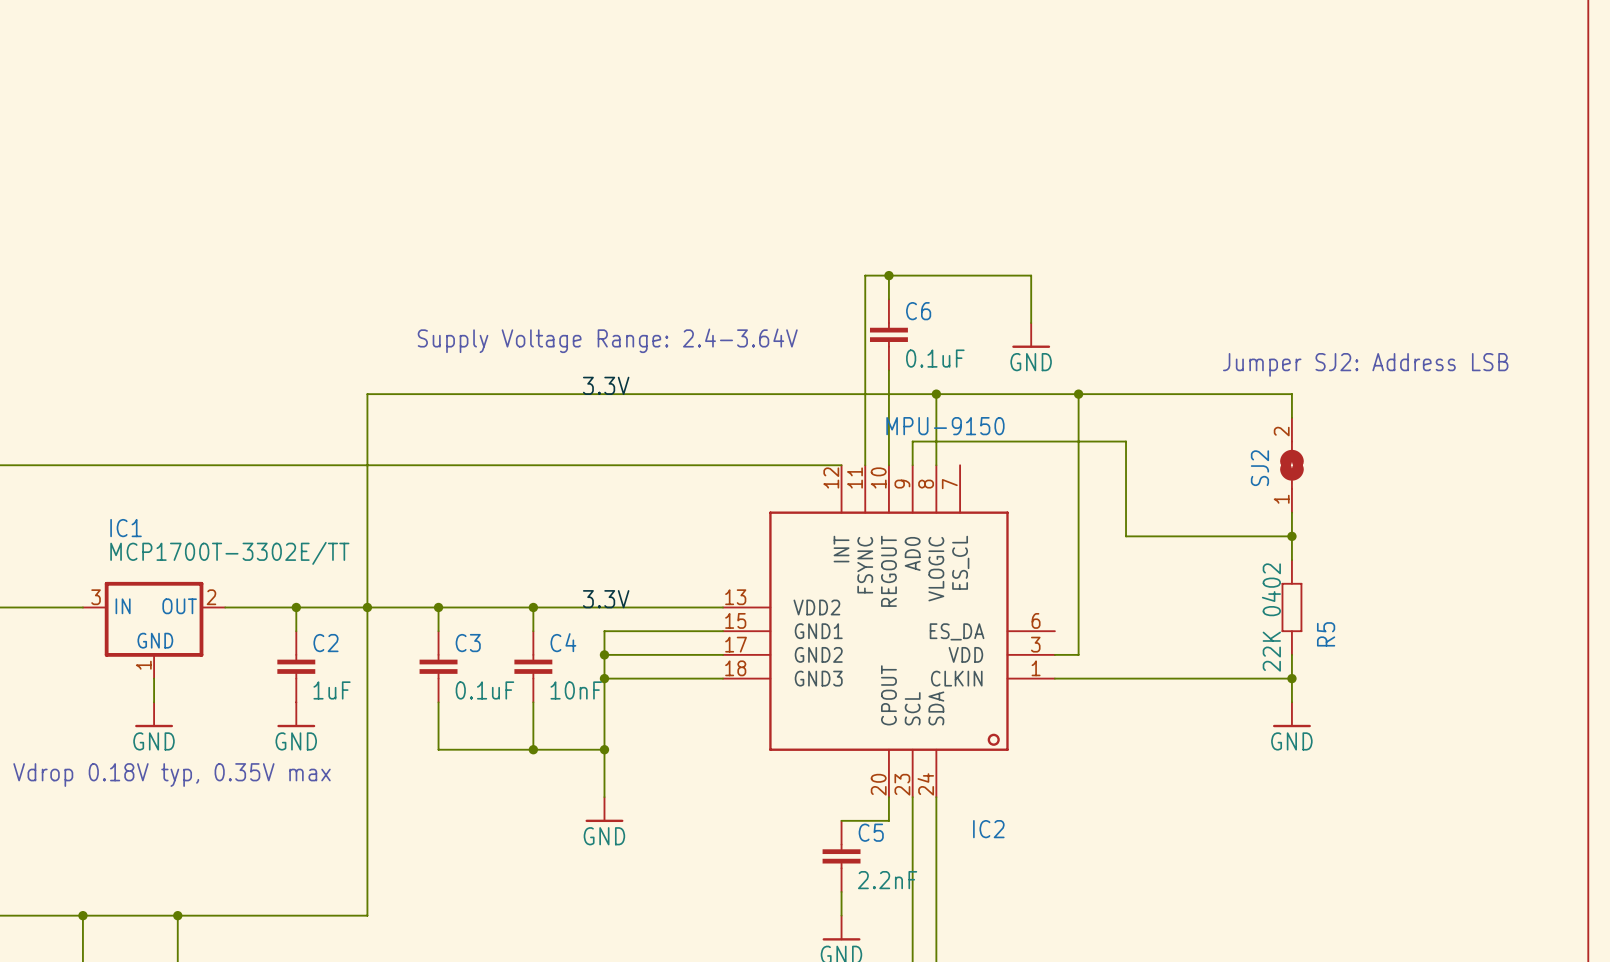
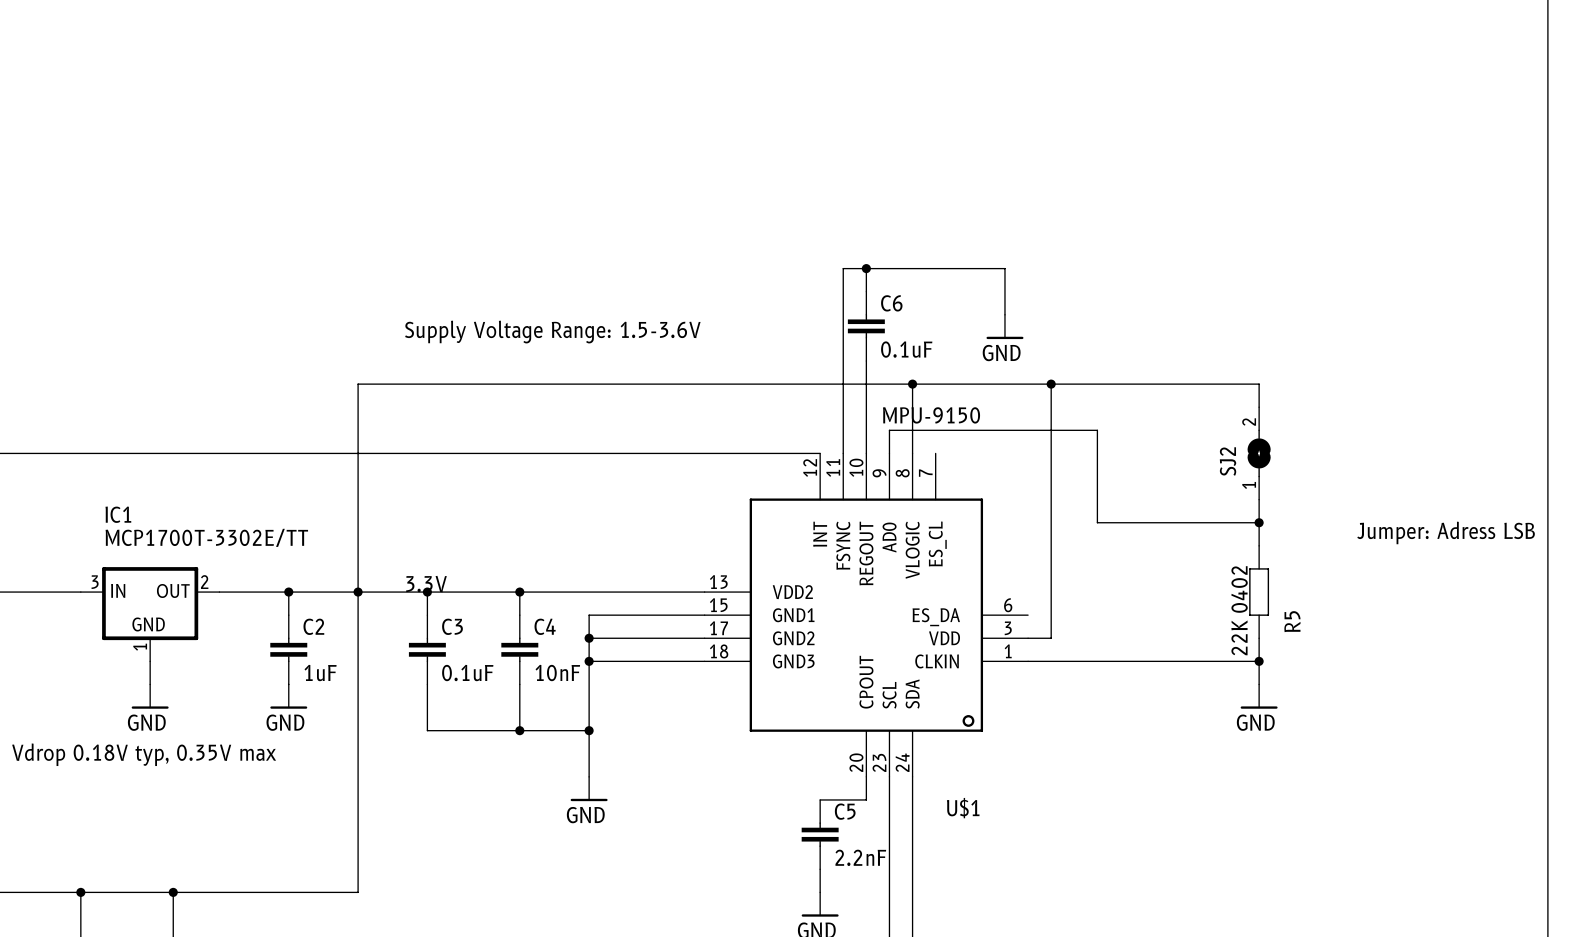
text: Supply Voltage Range: 2.4-3.64V (607, 340) -> Supply Voltage Range: 1.5-3.6V (552, 332)
text: Jumper SJ2: Address LSB (1365, 364) -> none
label: 3.3V (606, 385) -> none
text: none -> Jumper: Adress LSB (1446, 532)
label: none -> 3.3V (426, 584)
label: 3.3V (606, 599) -> none
IC2 name: IC2 (988, 829) -> U$1 (963, 808)

